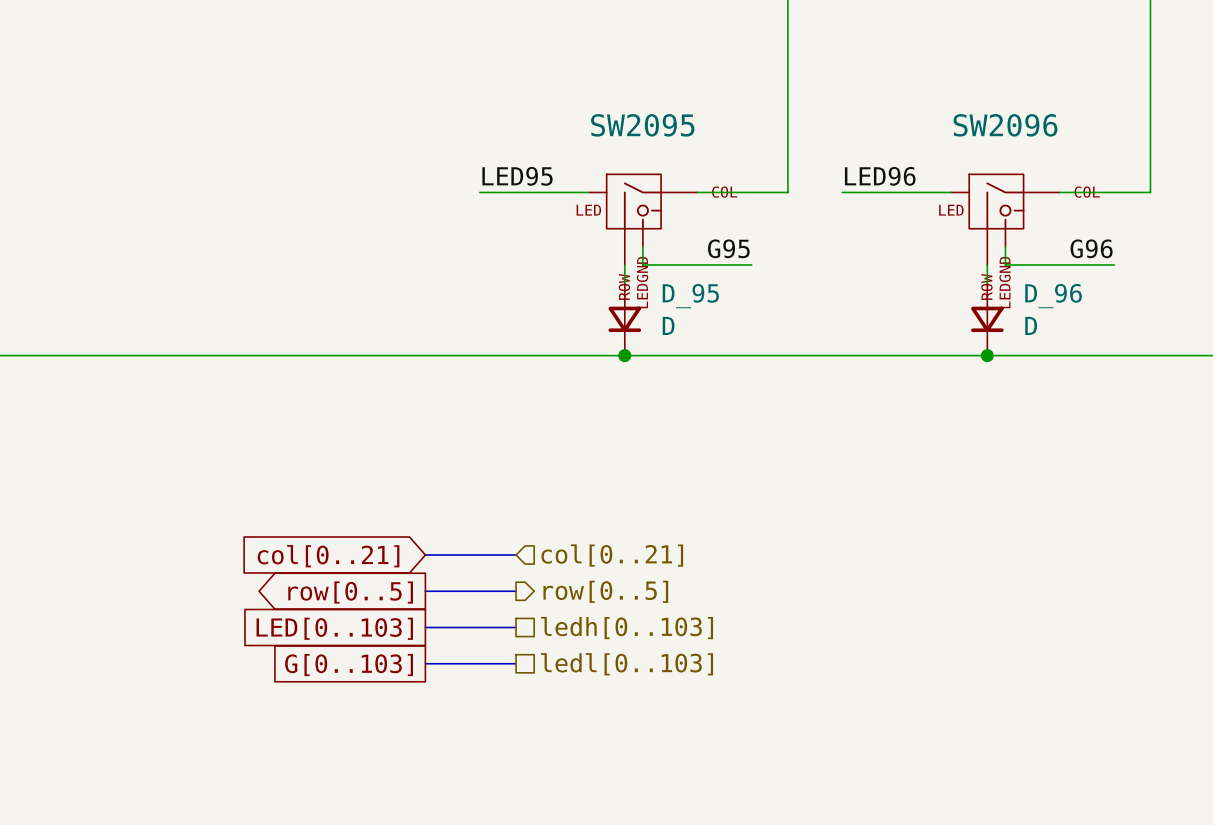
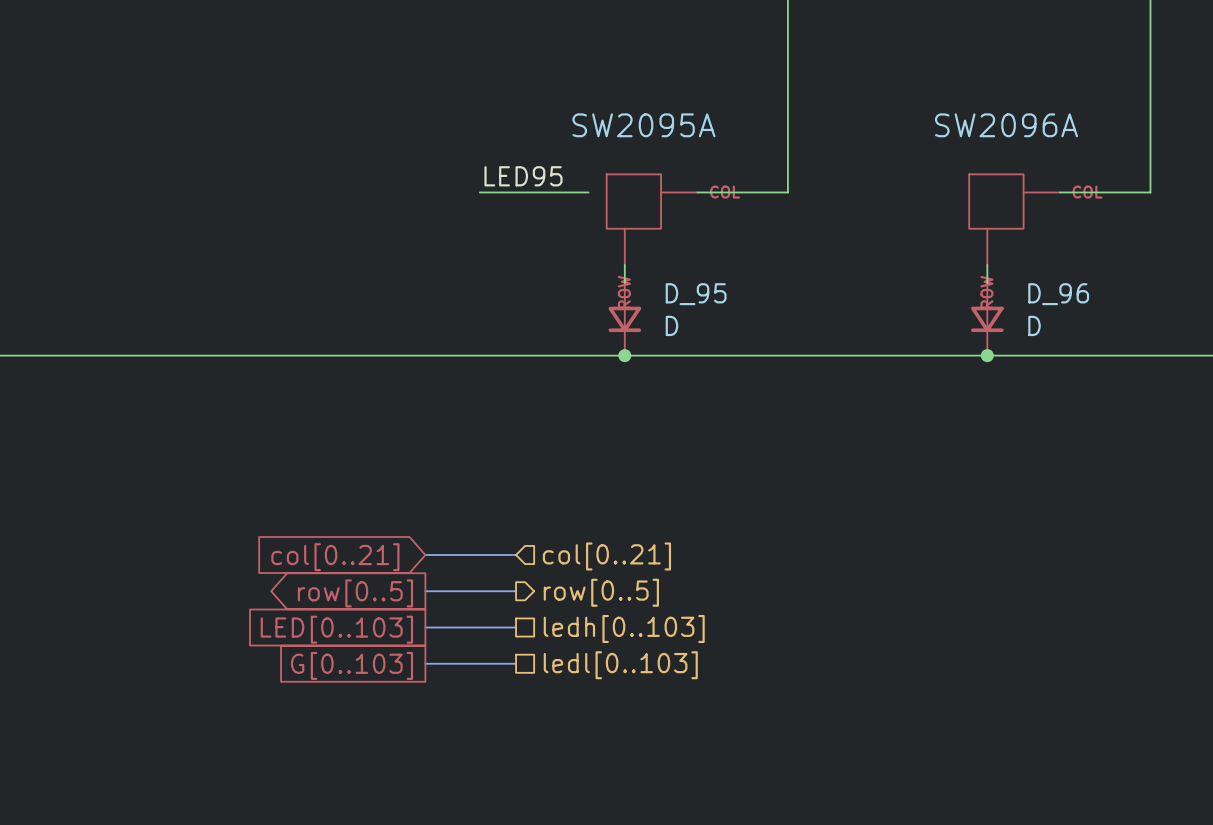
label: LED96 (880, 176) -> none
wire: (842, 192) (951, 192) -> none
SW2095: (642, 219) -> none
SW2095A: none -> (651, 219)
SW2096: (1005, 219) -> none
SW2096A: none -> (1014, 219)
wire: (642, 246) (642, 264) (751, 264) -> none
wire: (1005, 246) (1005, 264) (1114, 264) -> none
label: G95 (728, 248) -> none
label: G96 (1091, 248) -> none

